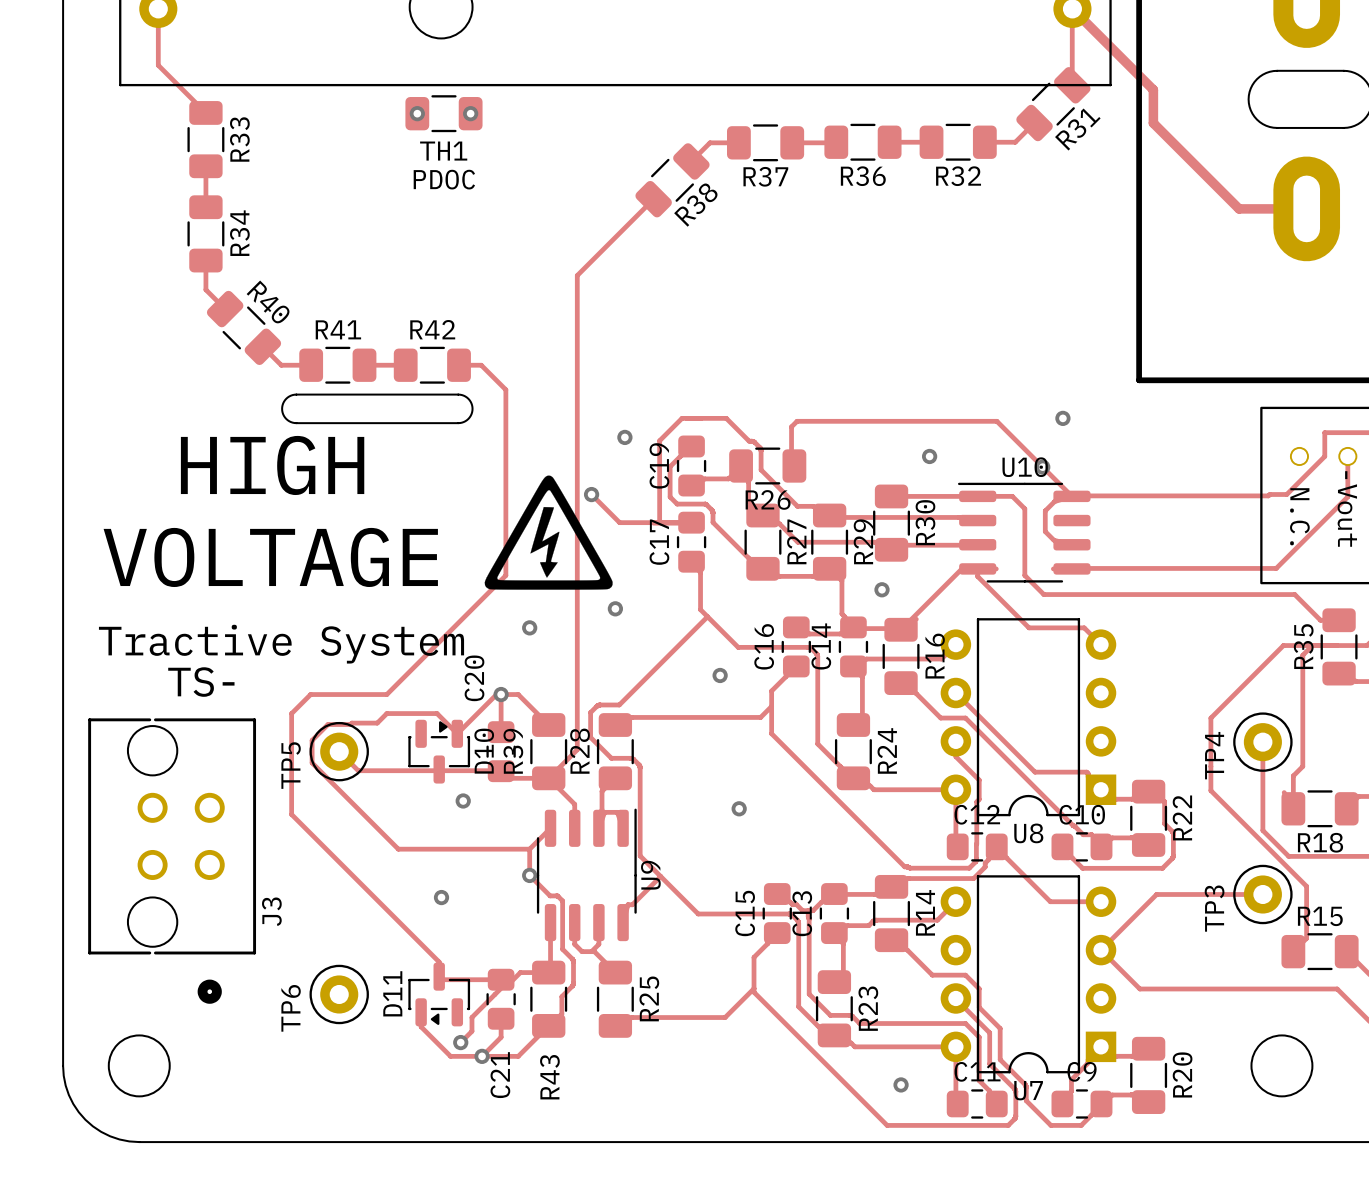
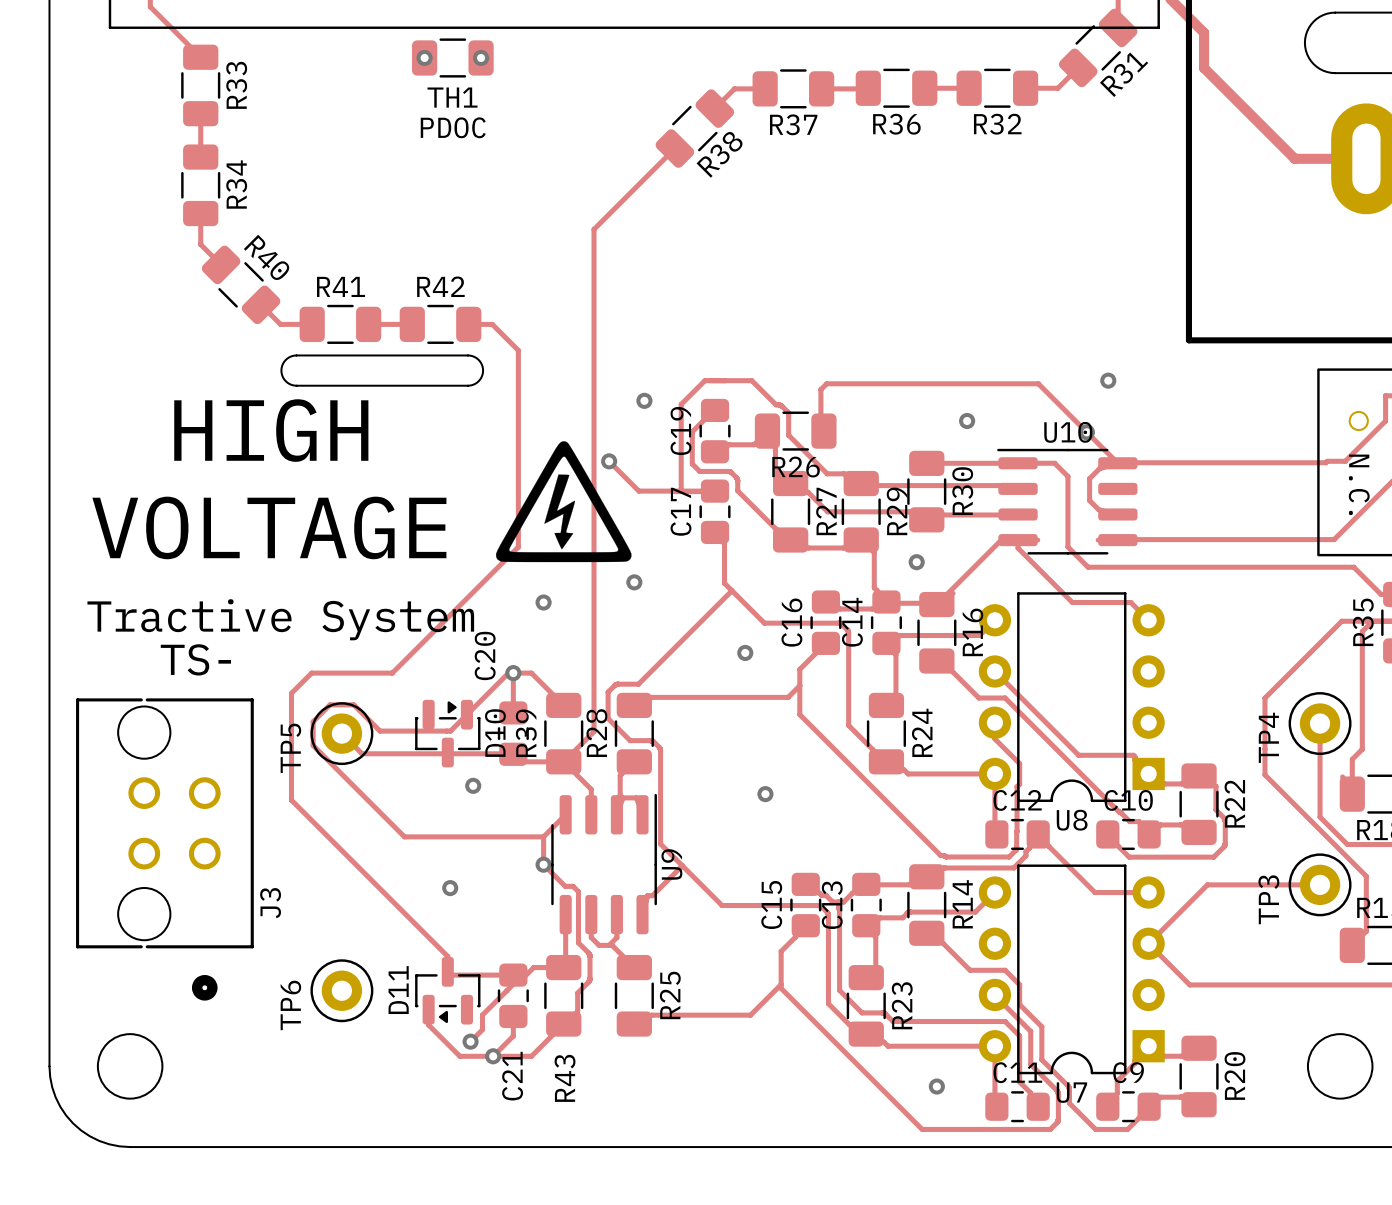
track: (350, 724) (377, 723) (386, 713) (437, 713) (457, 733) -> (353, 704) (380, 731) (446, 731)
track: none -> (466, 714) (450, 731) (446, 731)

